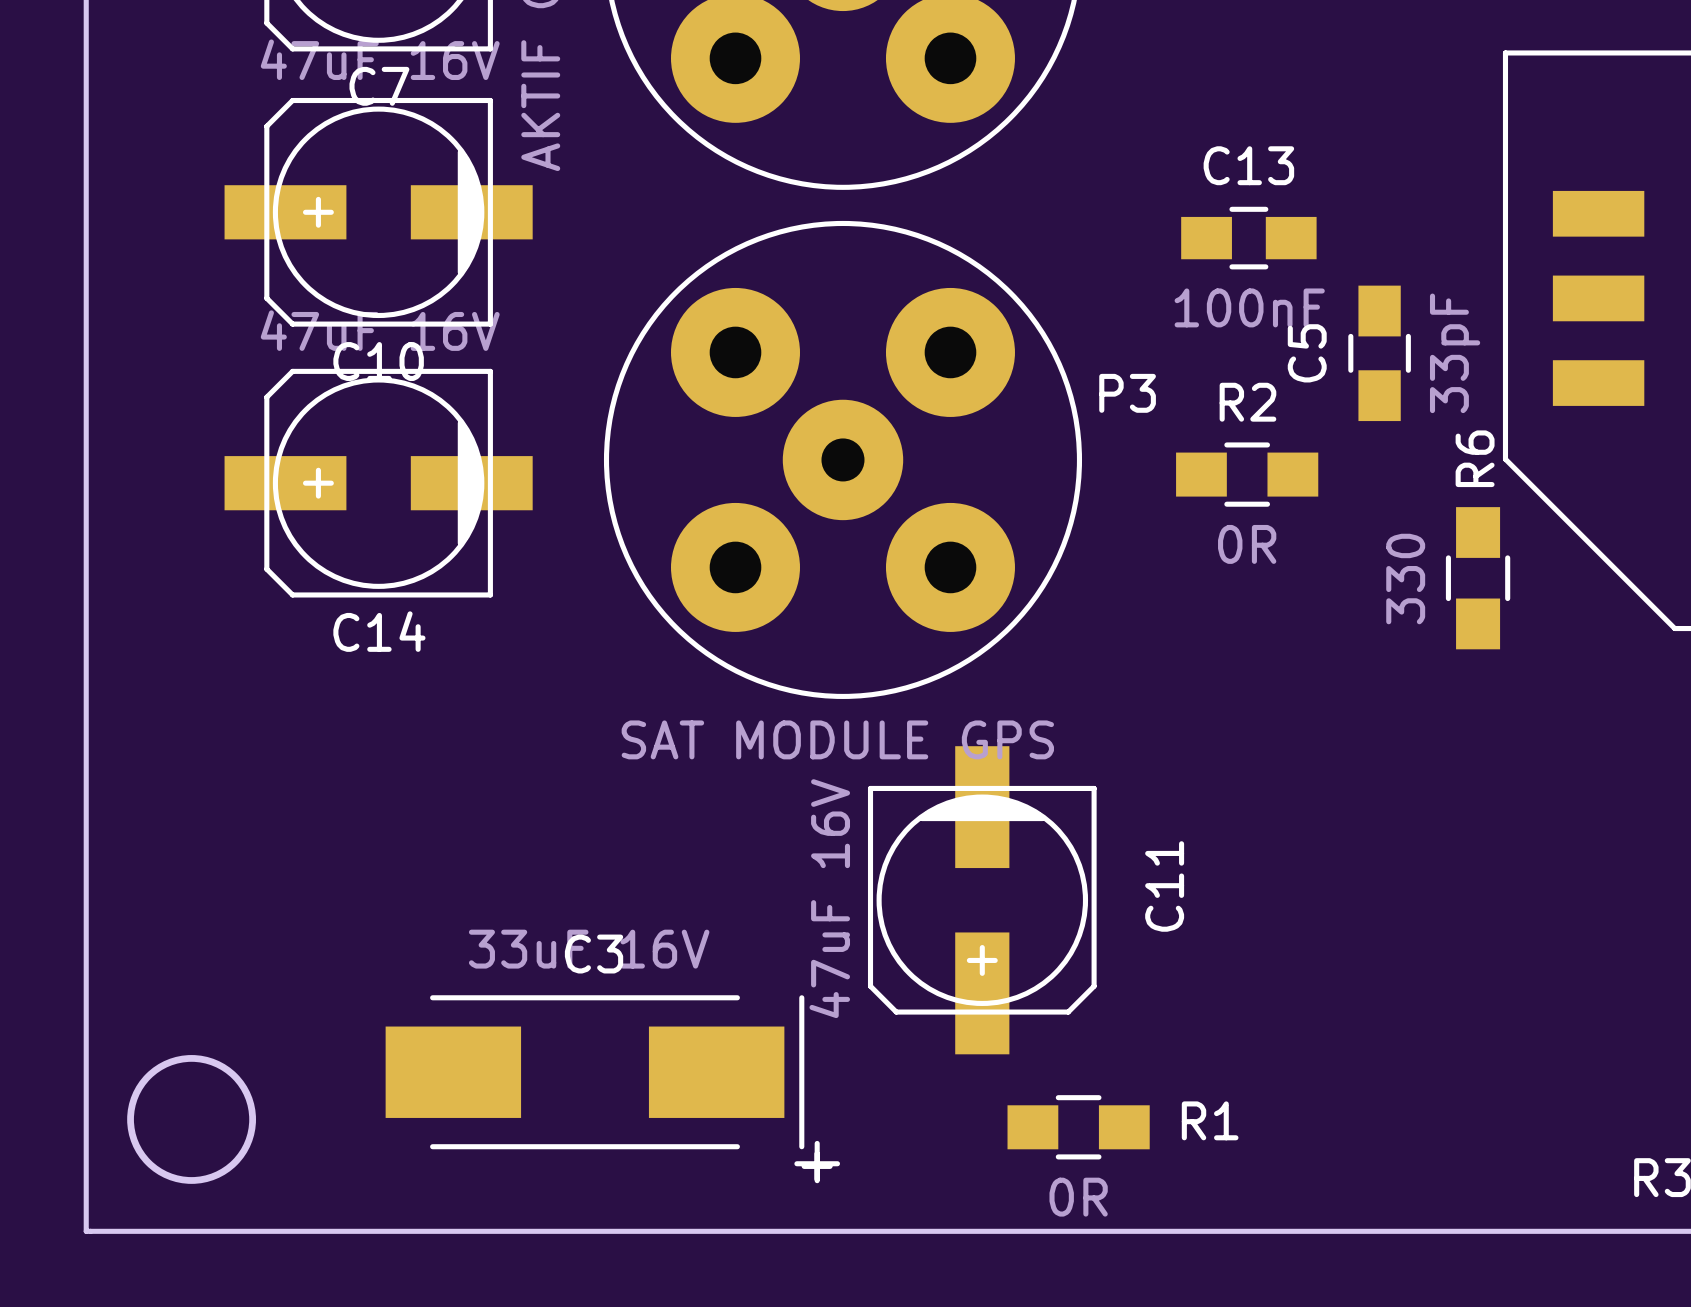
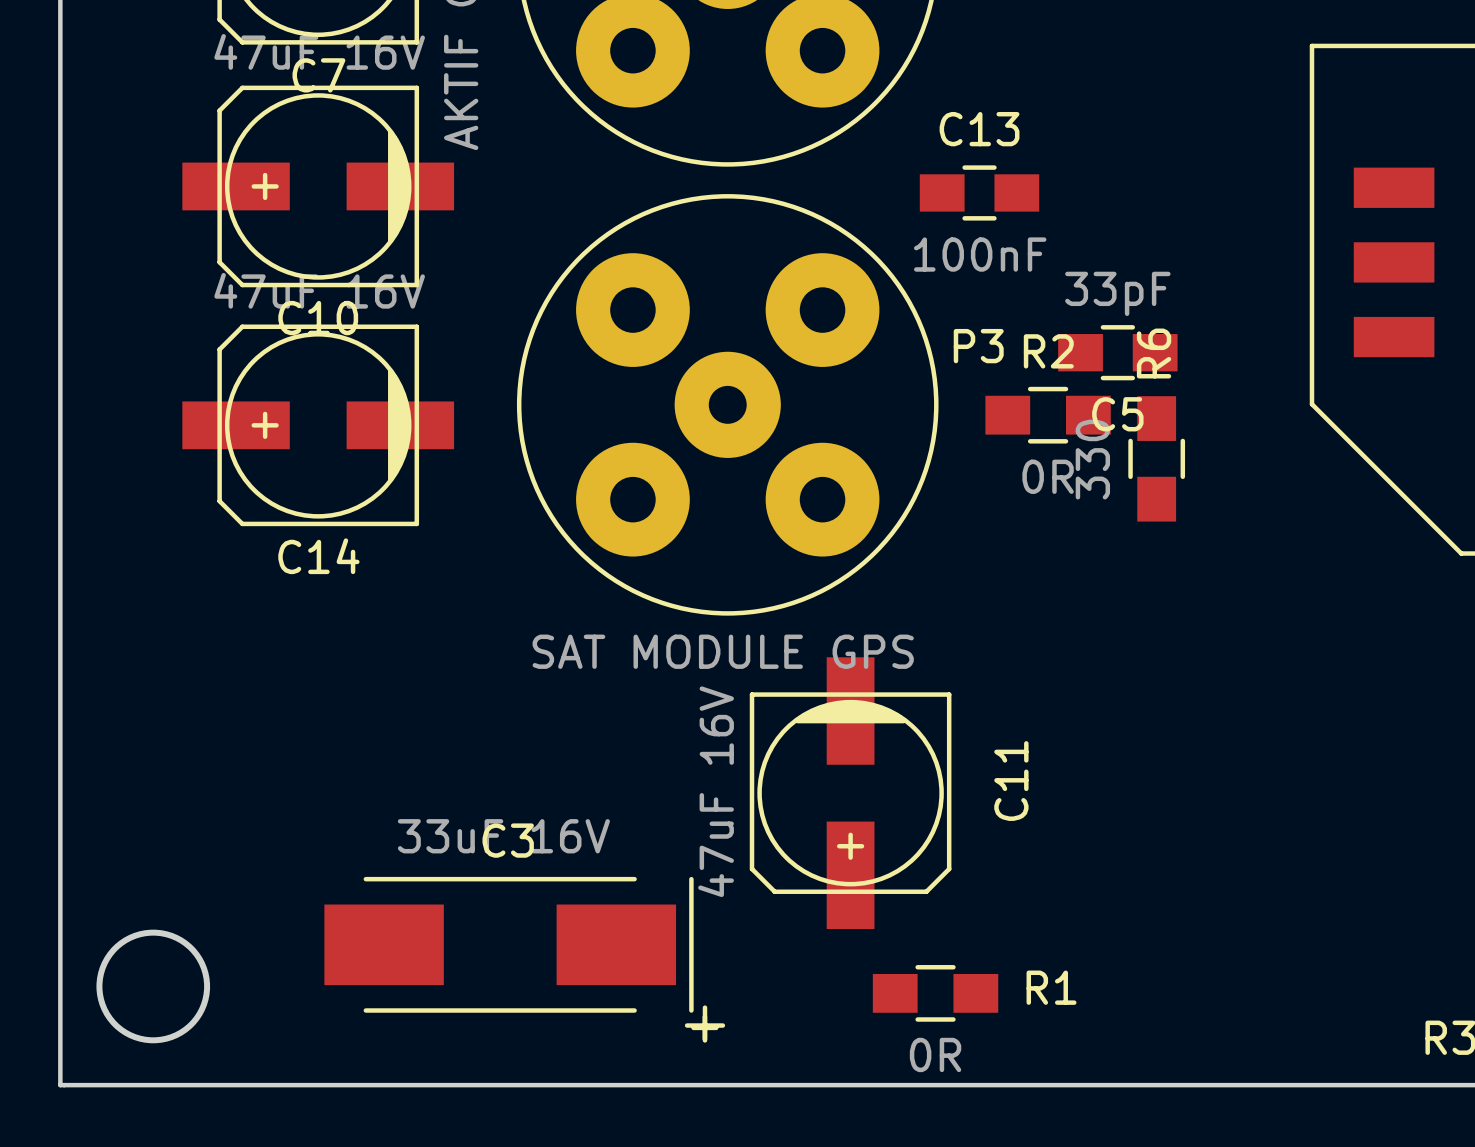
C13 position: (1248, 238) -> (979, 192)
C5 name position: C5 (1307, 353) -> C5 (1117, 414)
C5 rotation: 0° (1379, 353) -> 90° clockwise (1117, 352)
C5 position: (1379, 353) -> (1117, 352)
C5 value position: 33pF (1455, 353) -> 33pF (1117, 293)
R2 position: (1247, 474) -> (1048, 415)
R6 position: (1478, 578) -> (1156, 458)

